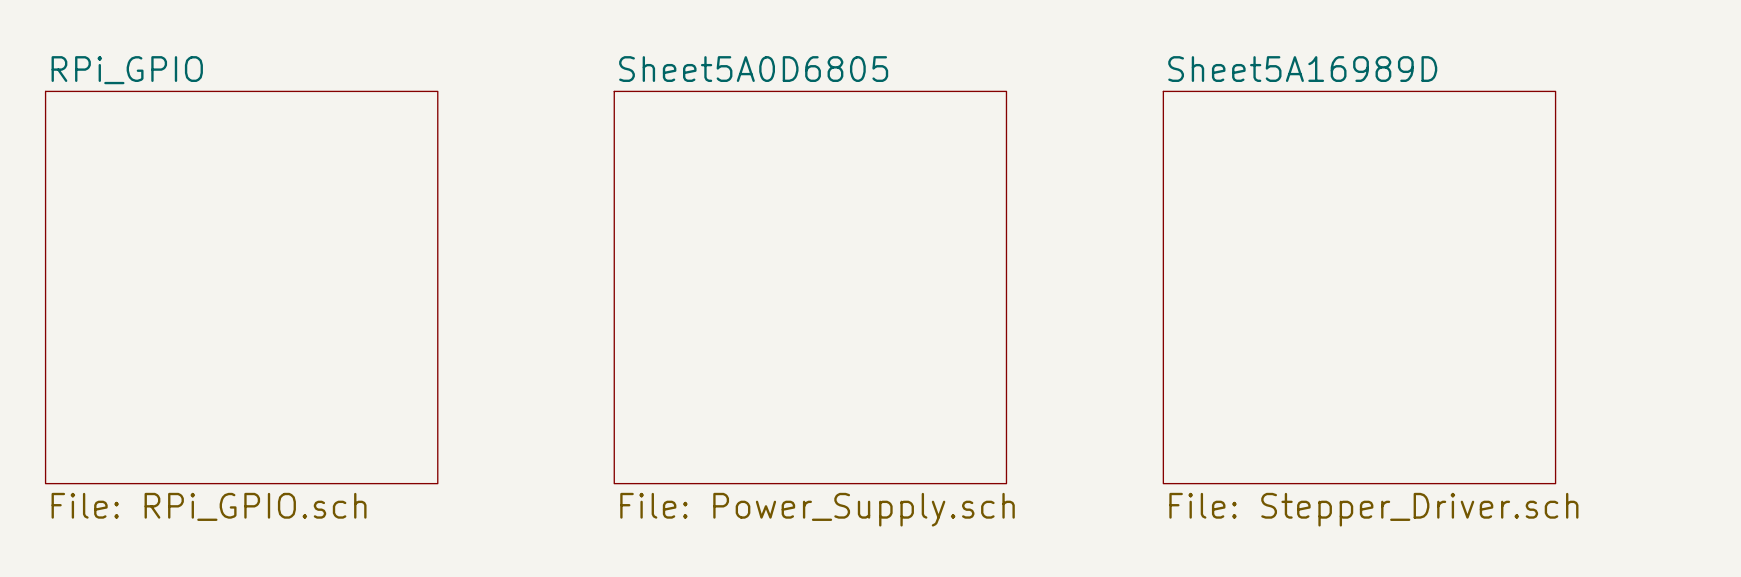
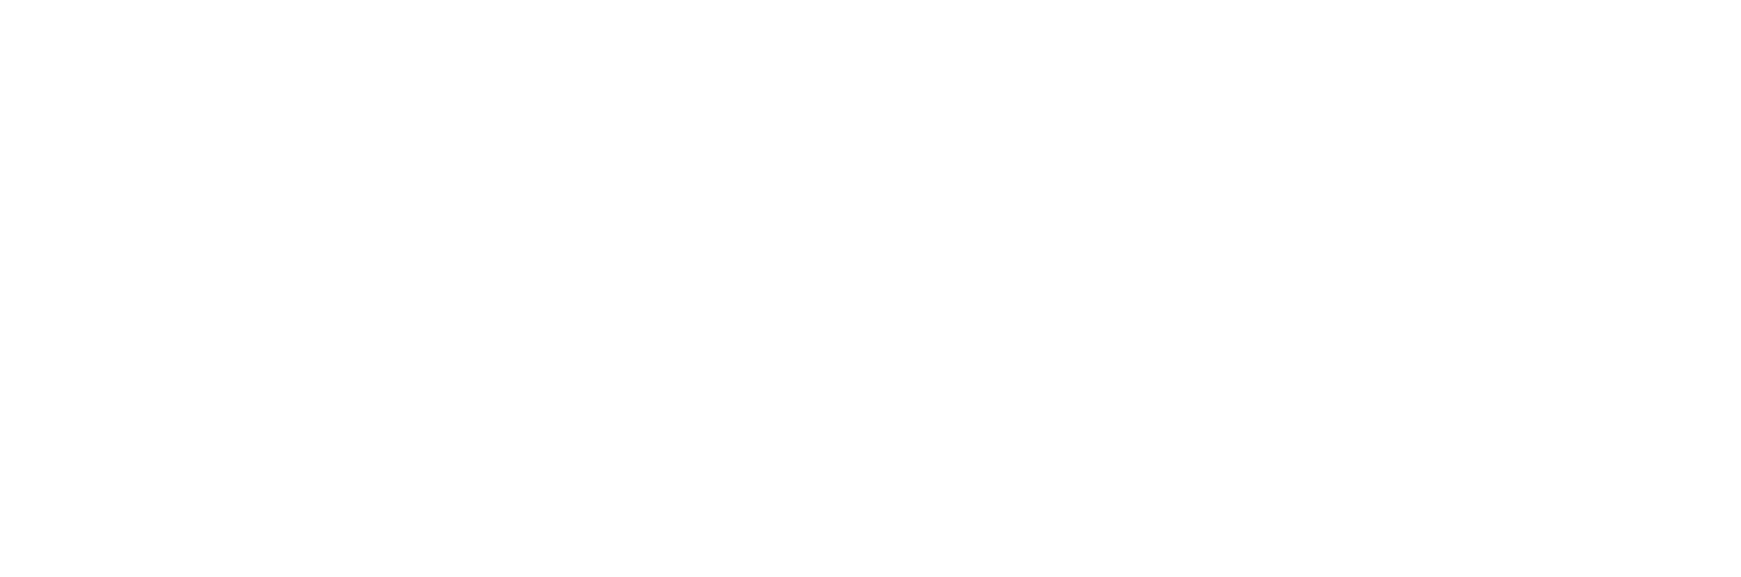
sheet RPi_GPIO: File: RPi_GPIO.sch (241, 287) -> none
sheet Sheet5A0D6805: File: Power_Supply.sch (810, 287) -> none
sheet Sheet5A16989D: File: Stepper_Driver.sch (1359, 287) -> none

